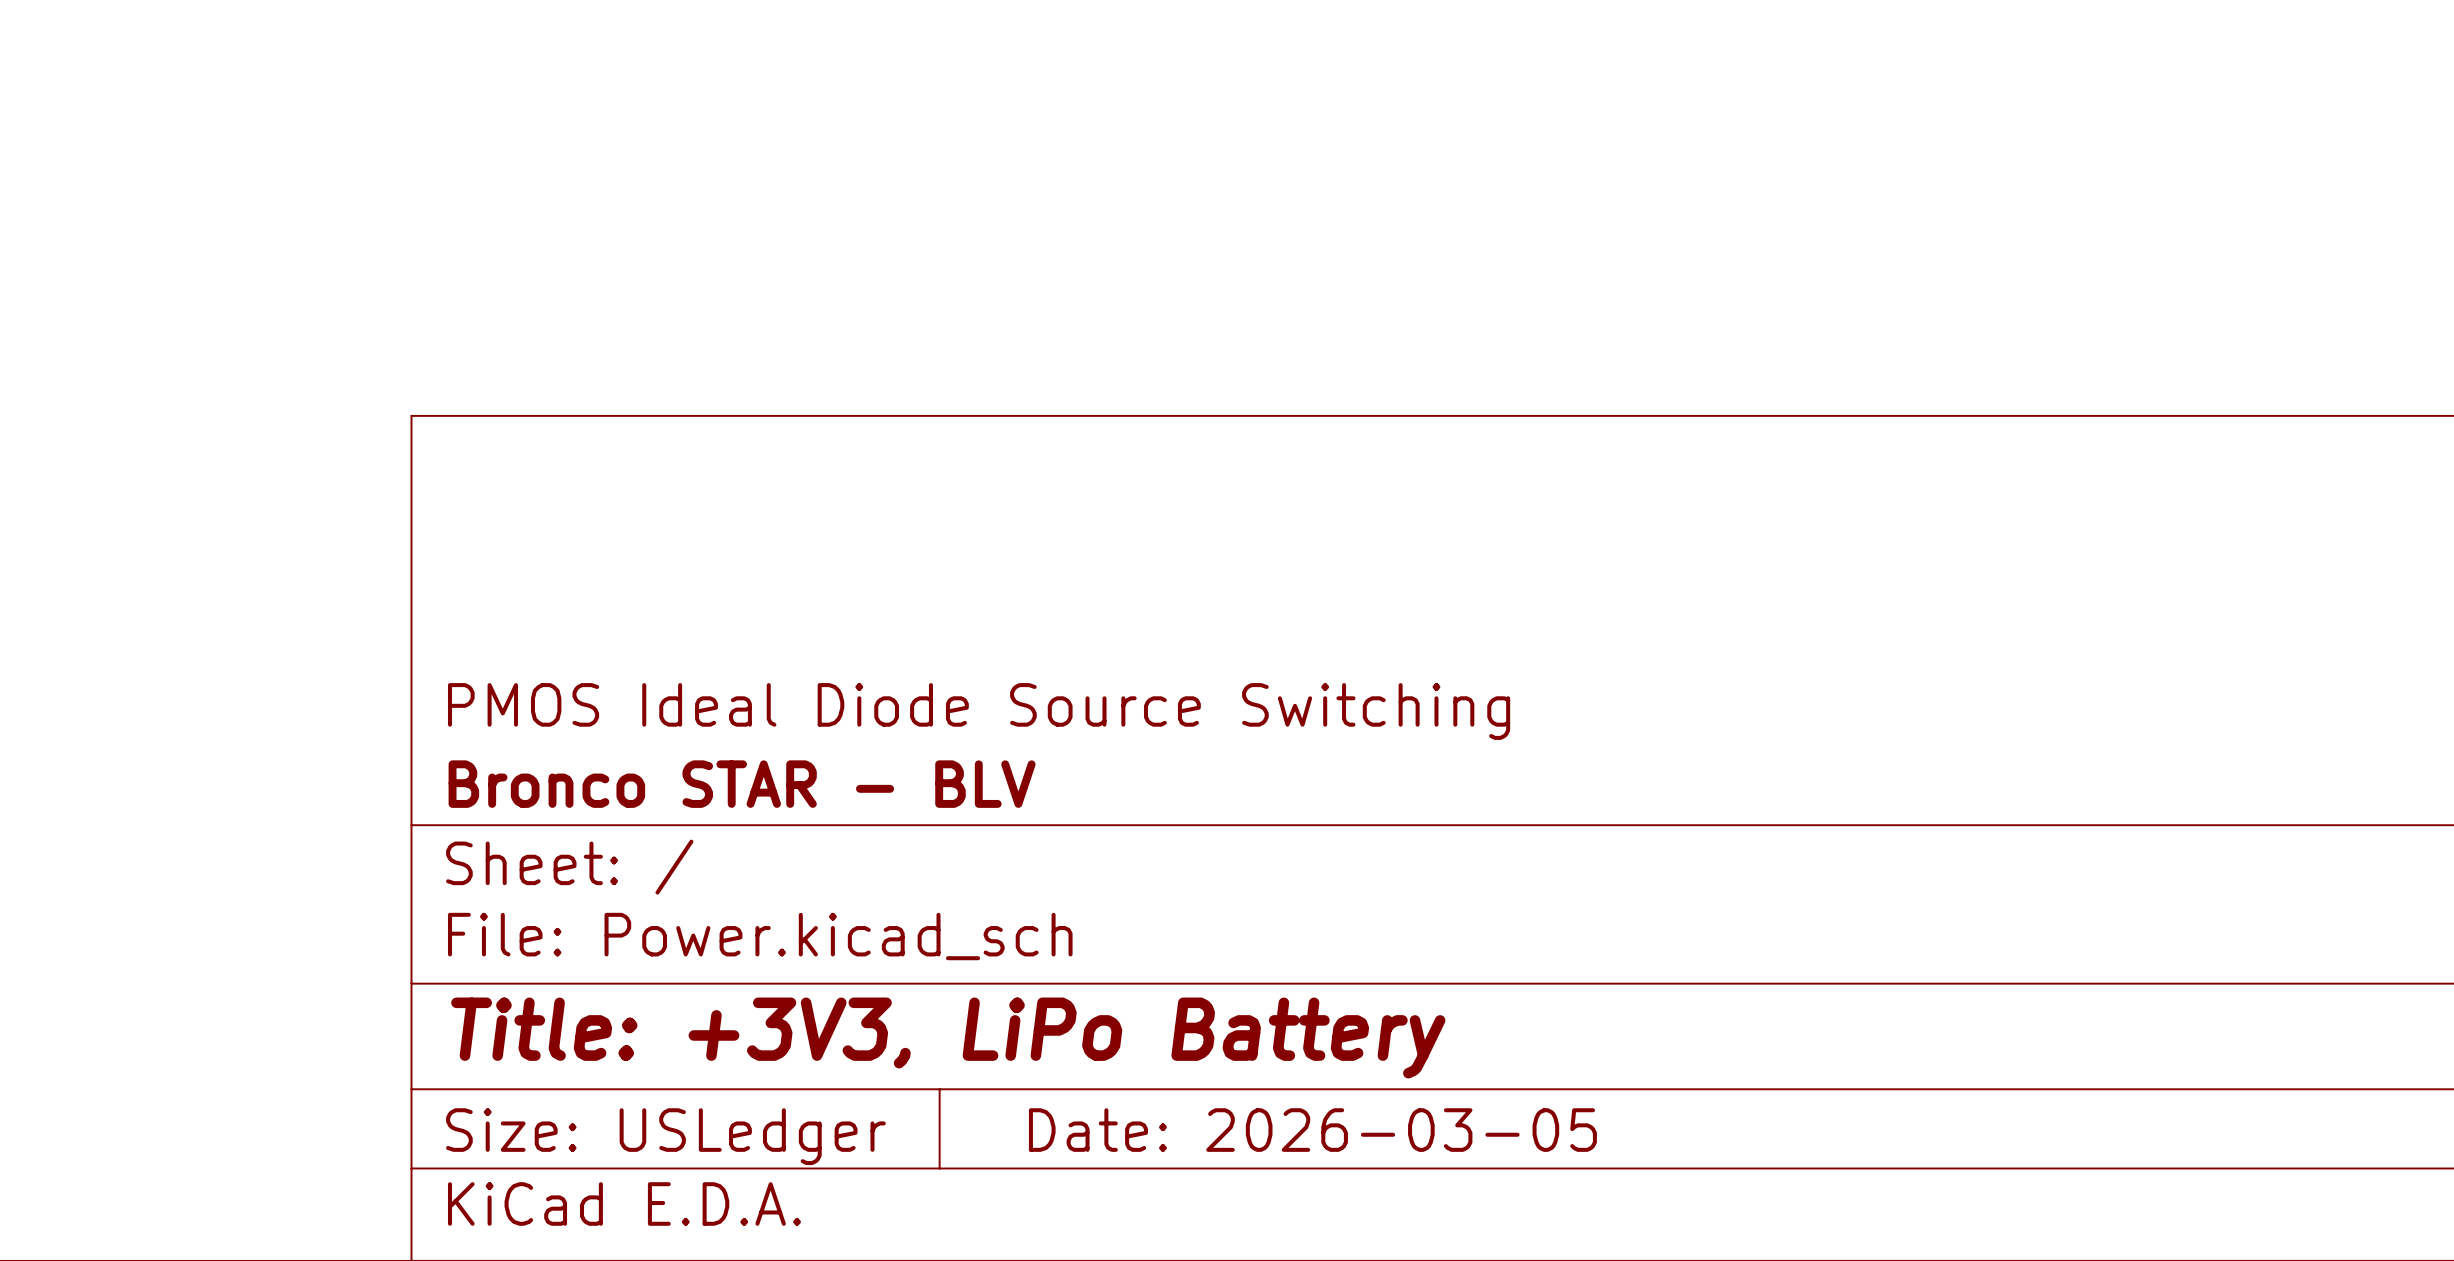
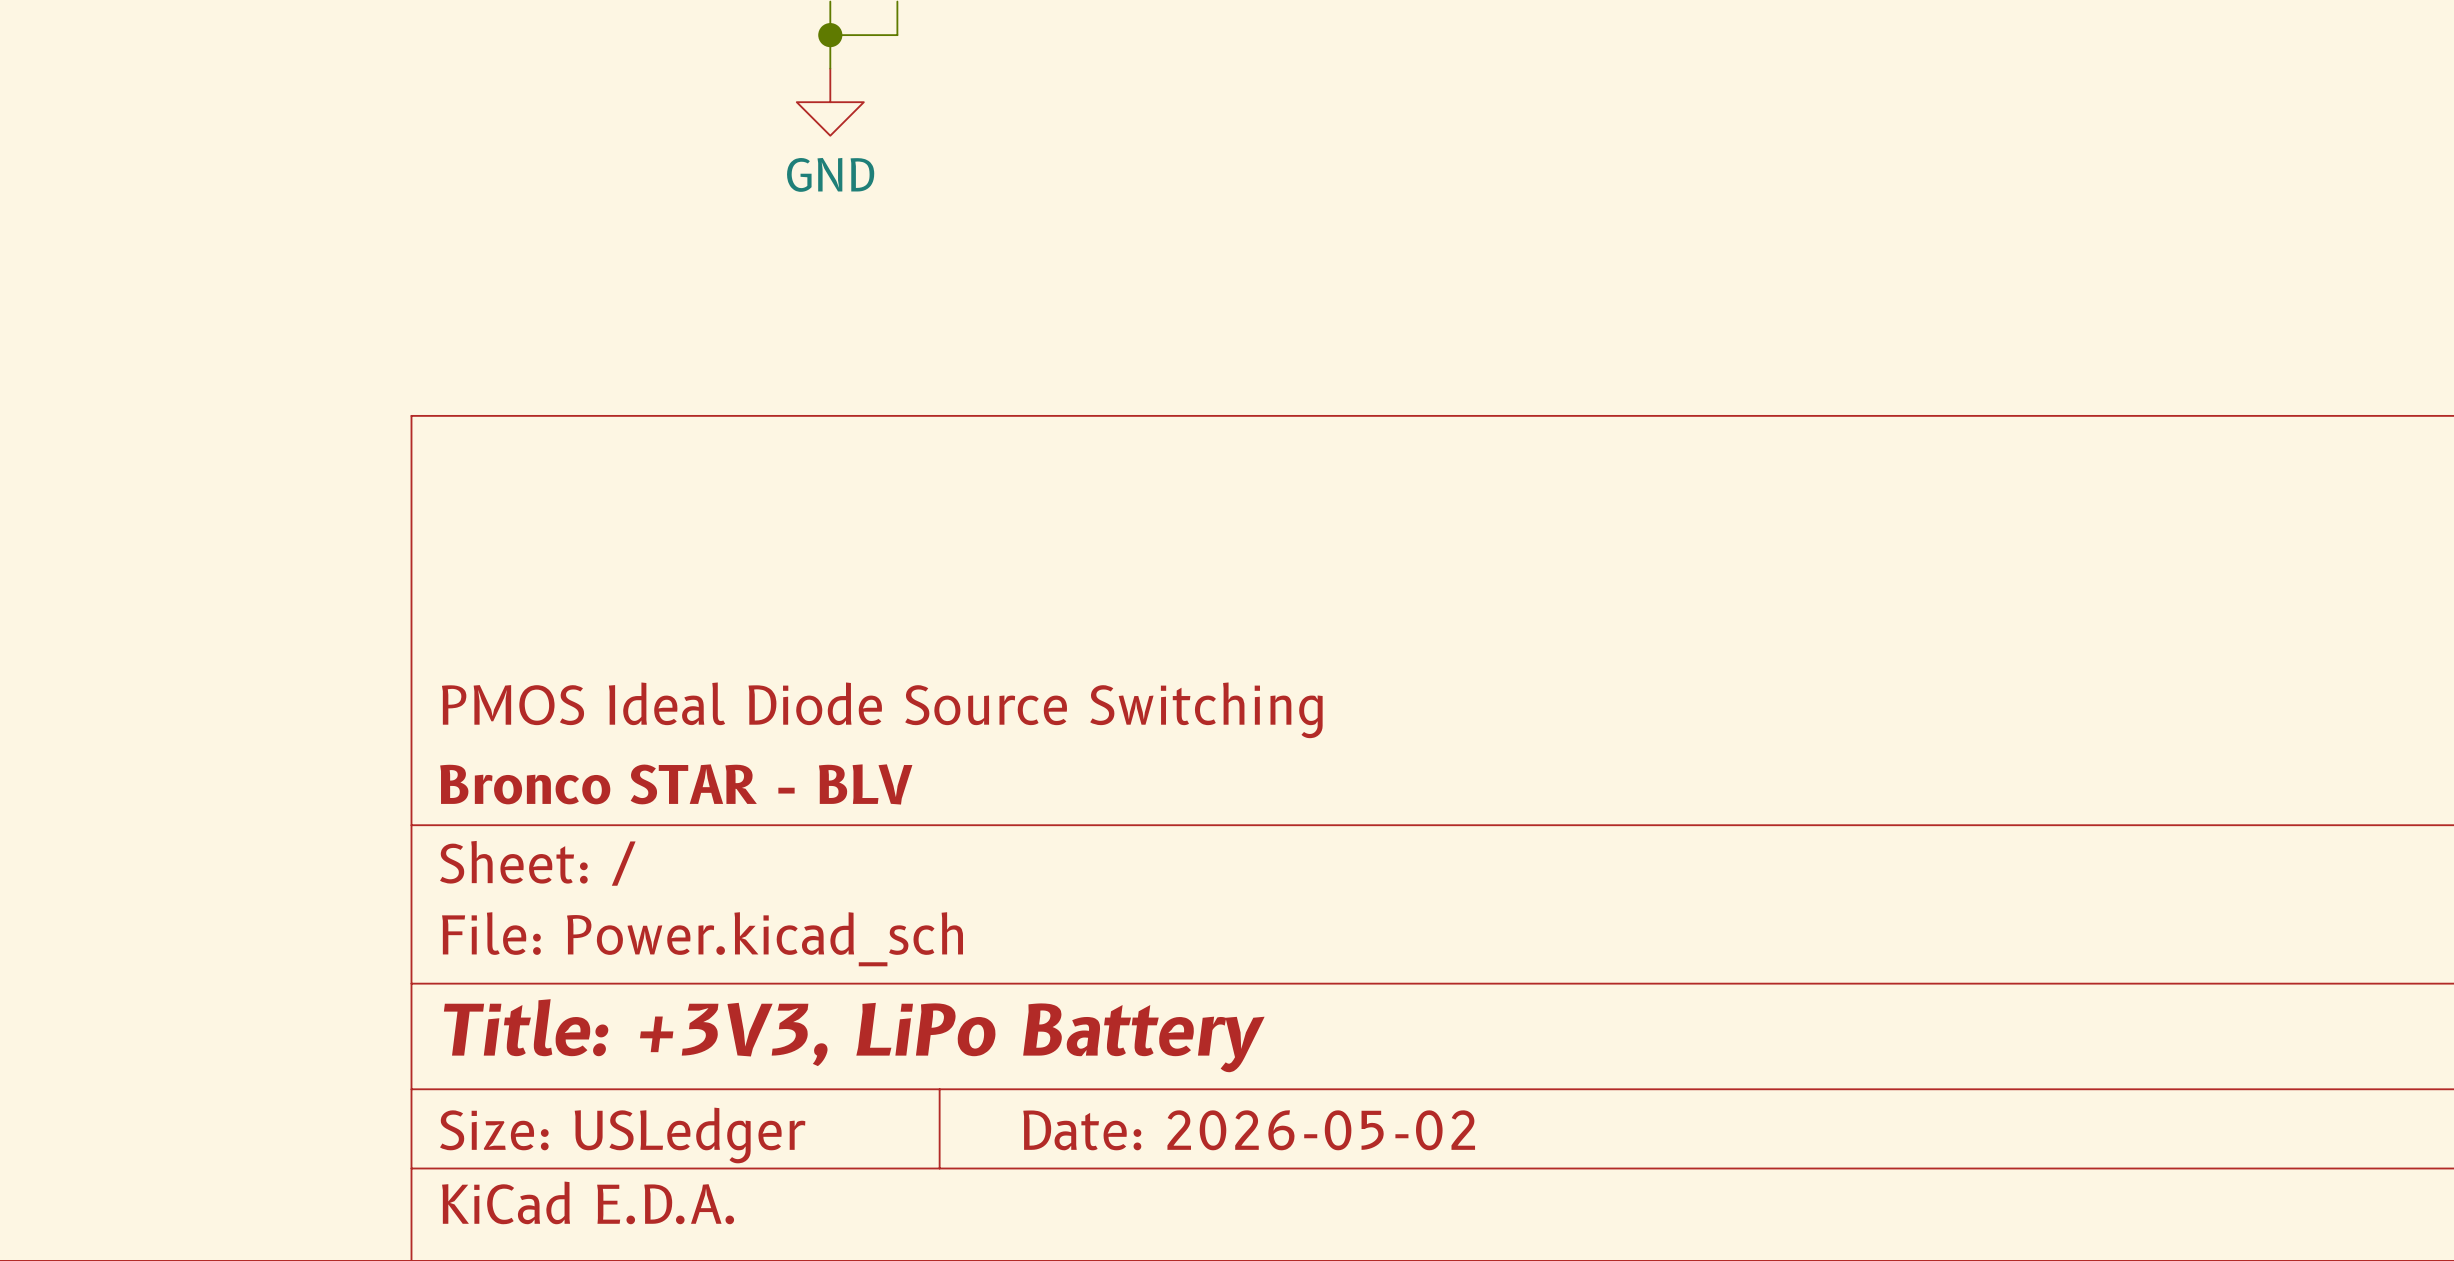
wire: none -> (830, 1) (830, 68)
wire: none -> (897, 1) (897, 35) (830, 35)
junction: none -> (830, 35)
power symbol: none -> GND (830, 102)
title block: Date: 2026-03-05 (1312, 1130) -> Date: 2026-05-02 (1249, 1130)

